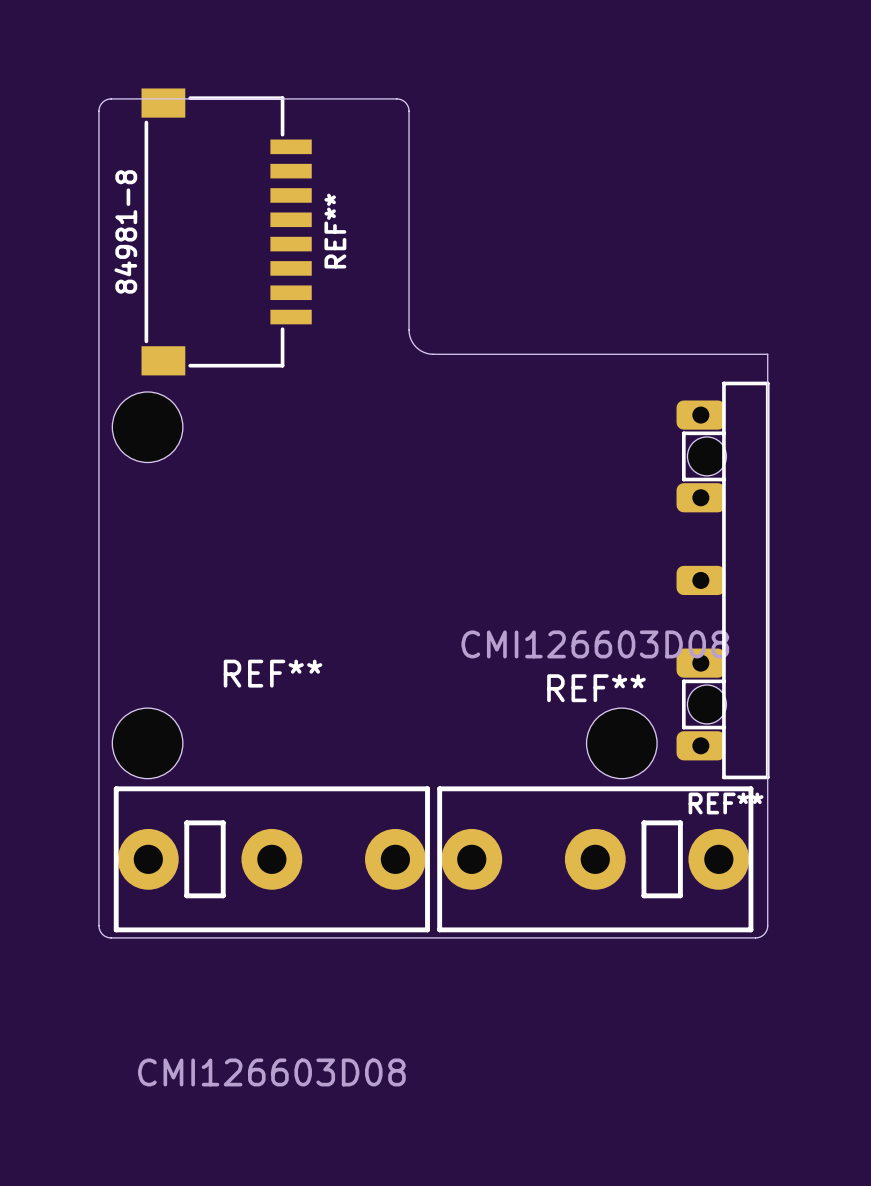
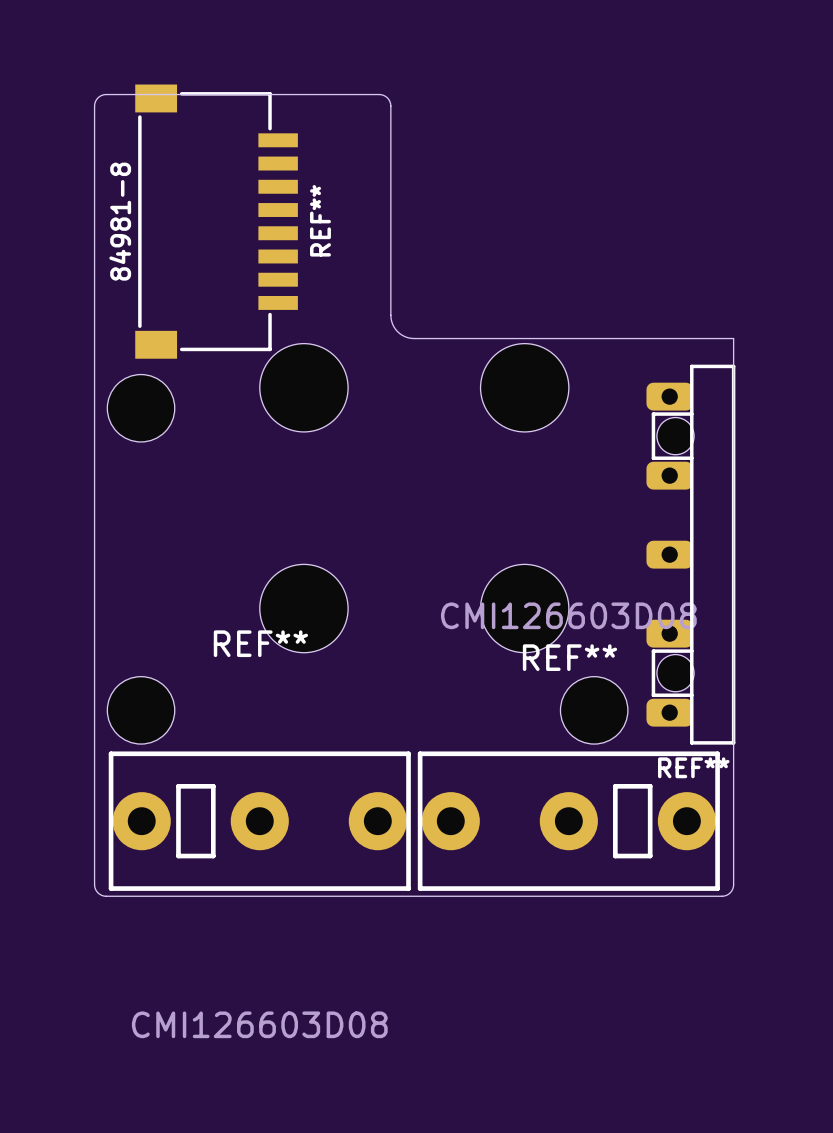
part: none -> (303, 387)
part: none -> (524, 387)
part: none -> (303, 608)
part: none -> (524, 608)

